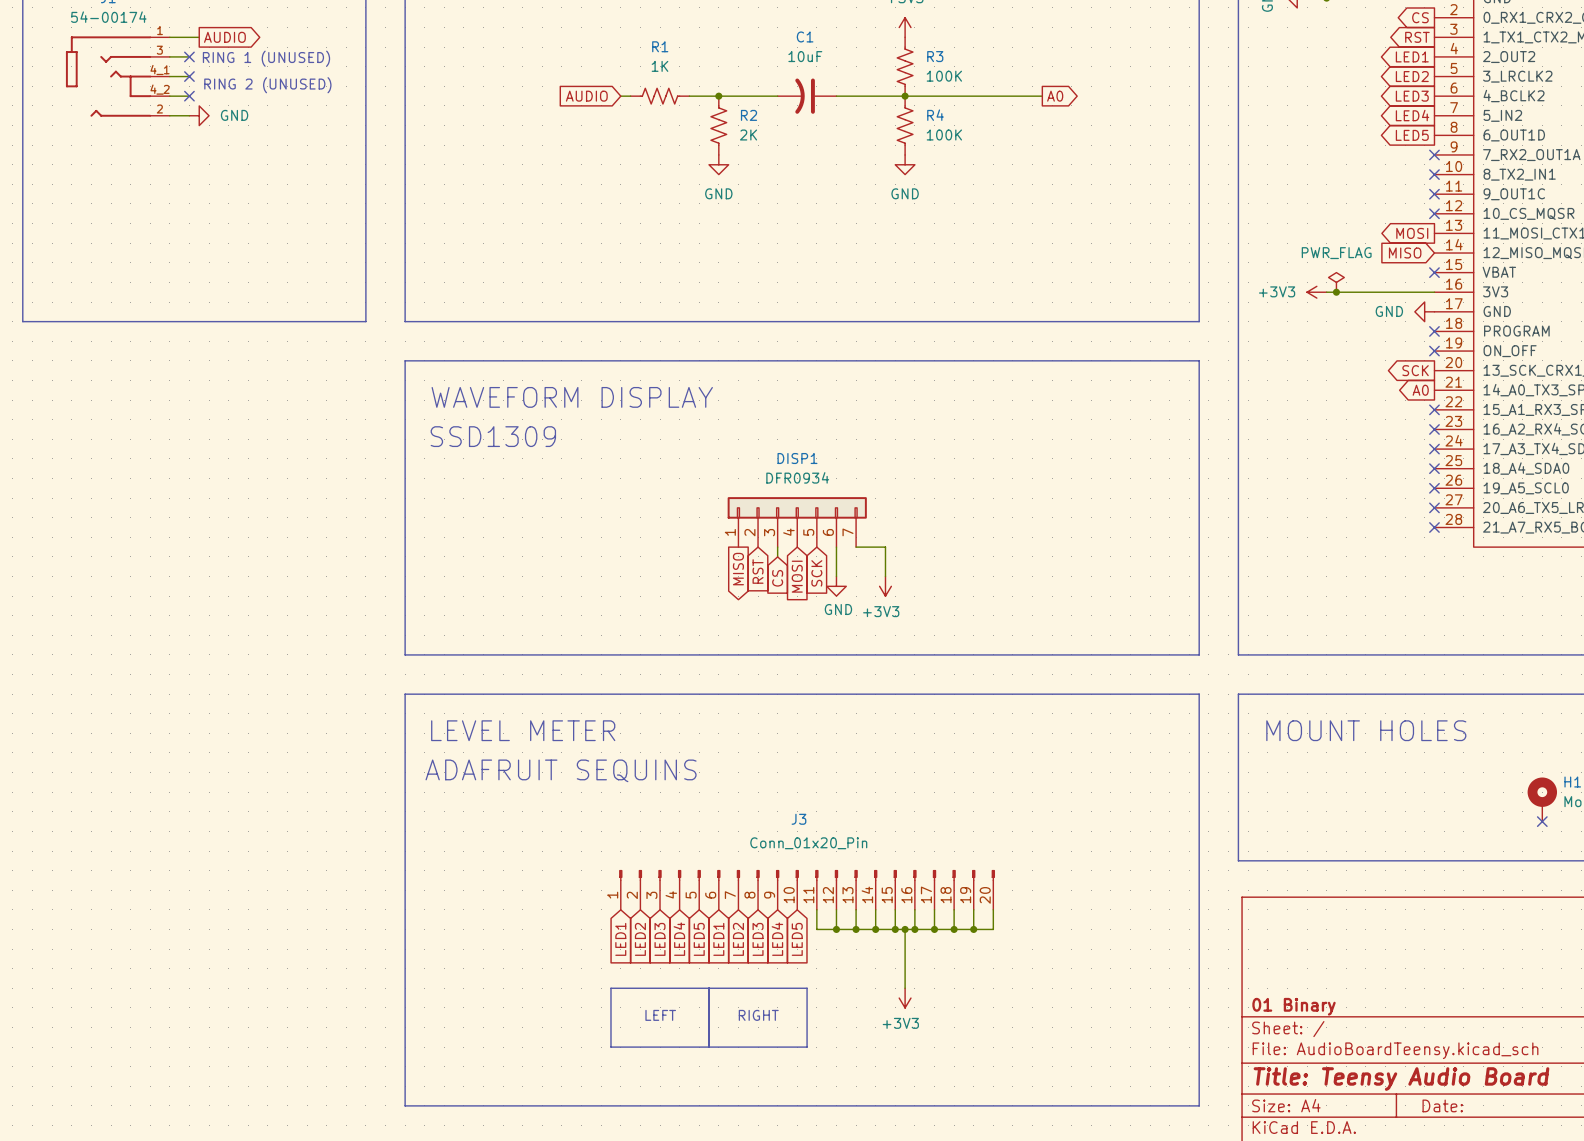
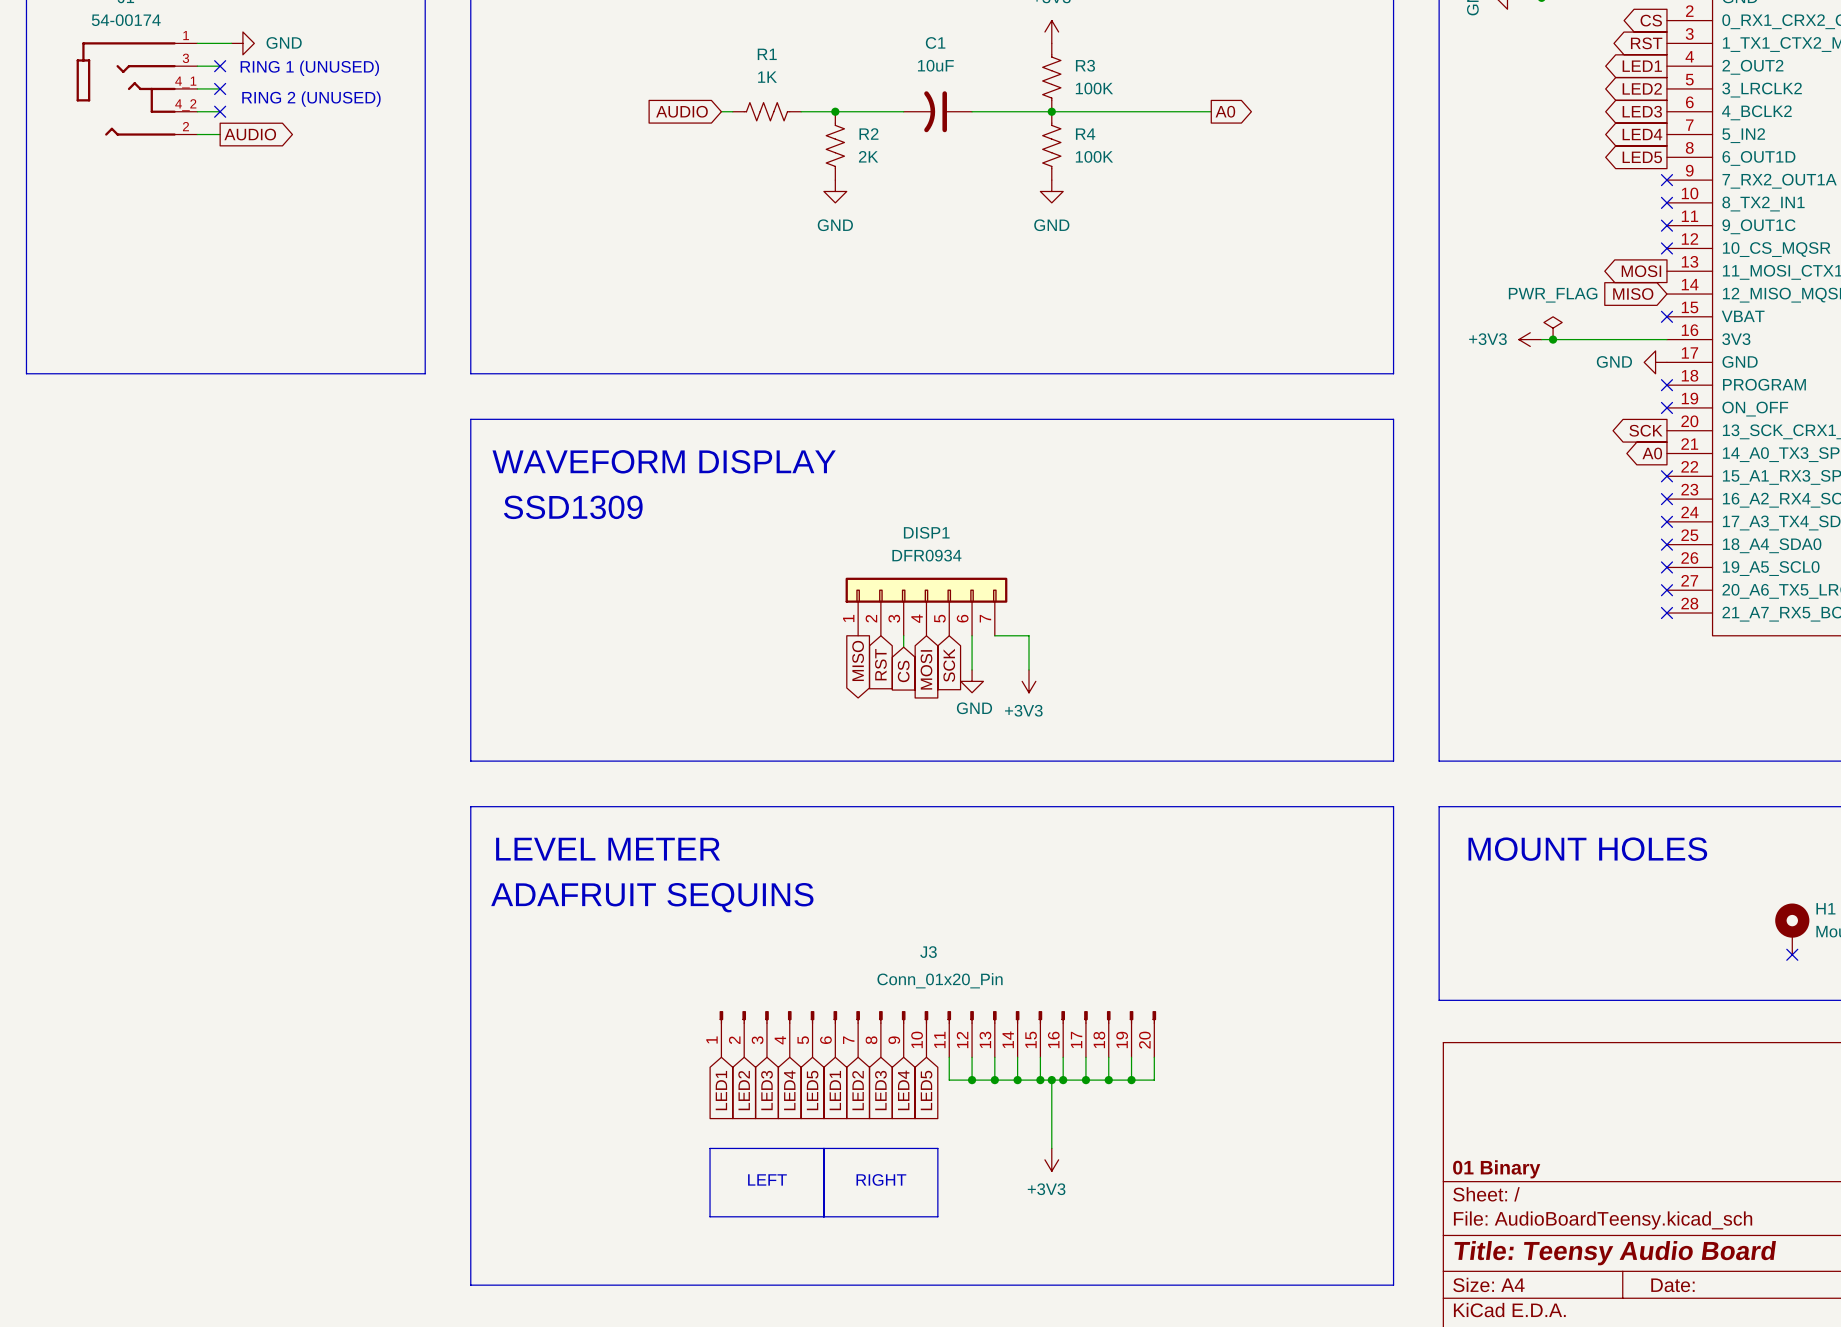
global label position: AUDIO (224, 37) -> AUDIO (250, 134)
power symbol position: GND (199, 115) -> GND (242, 43)

